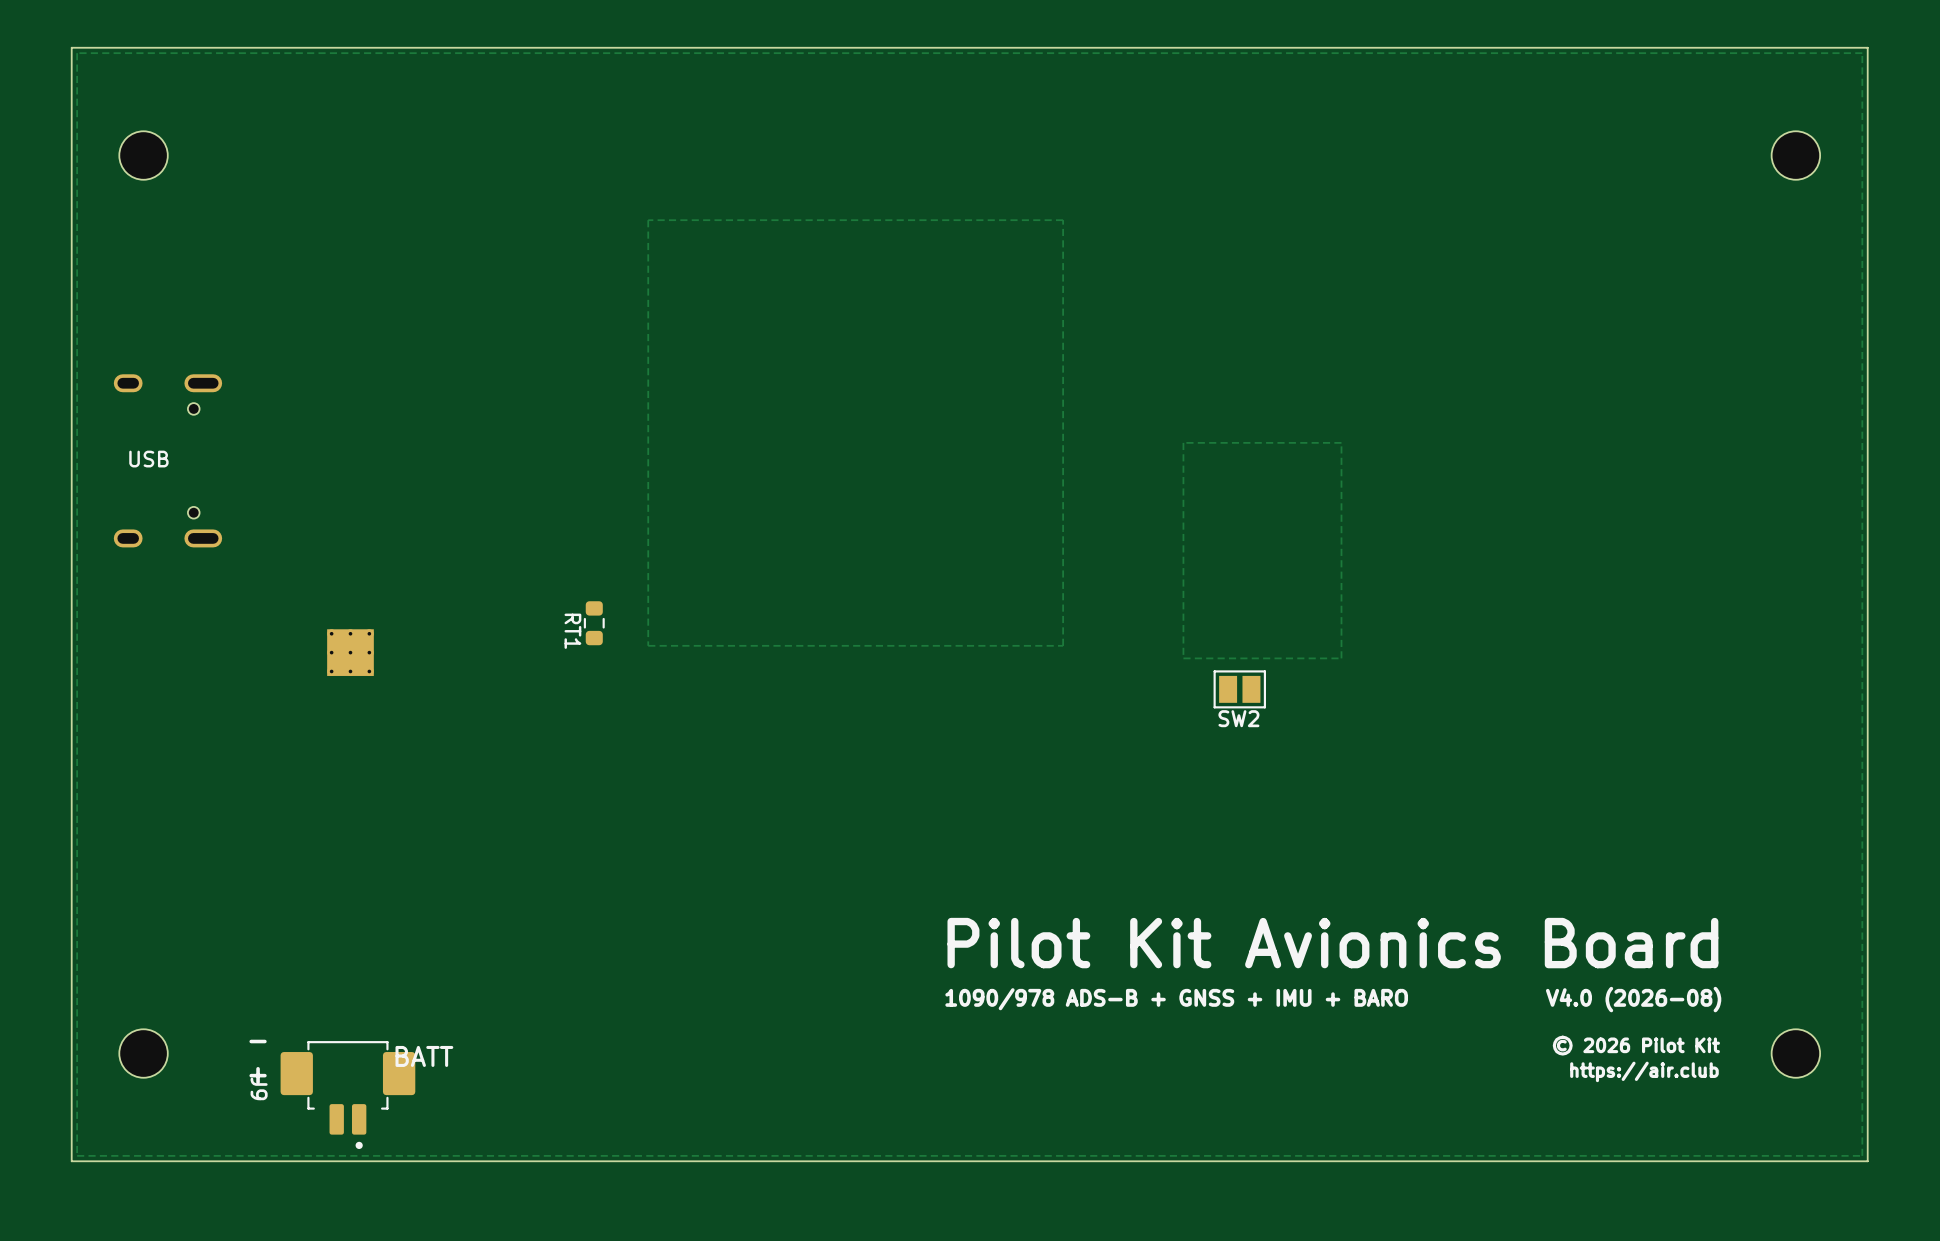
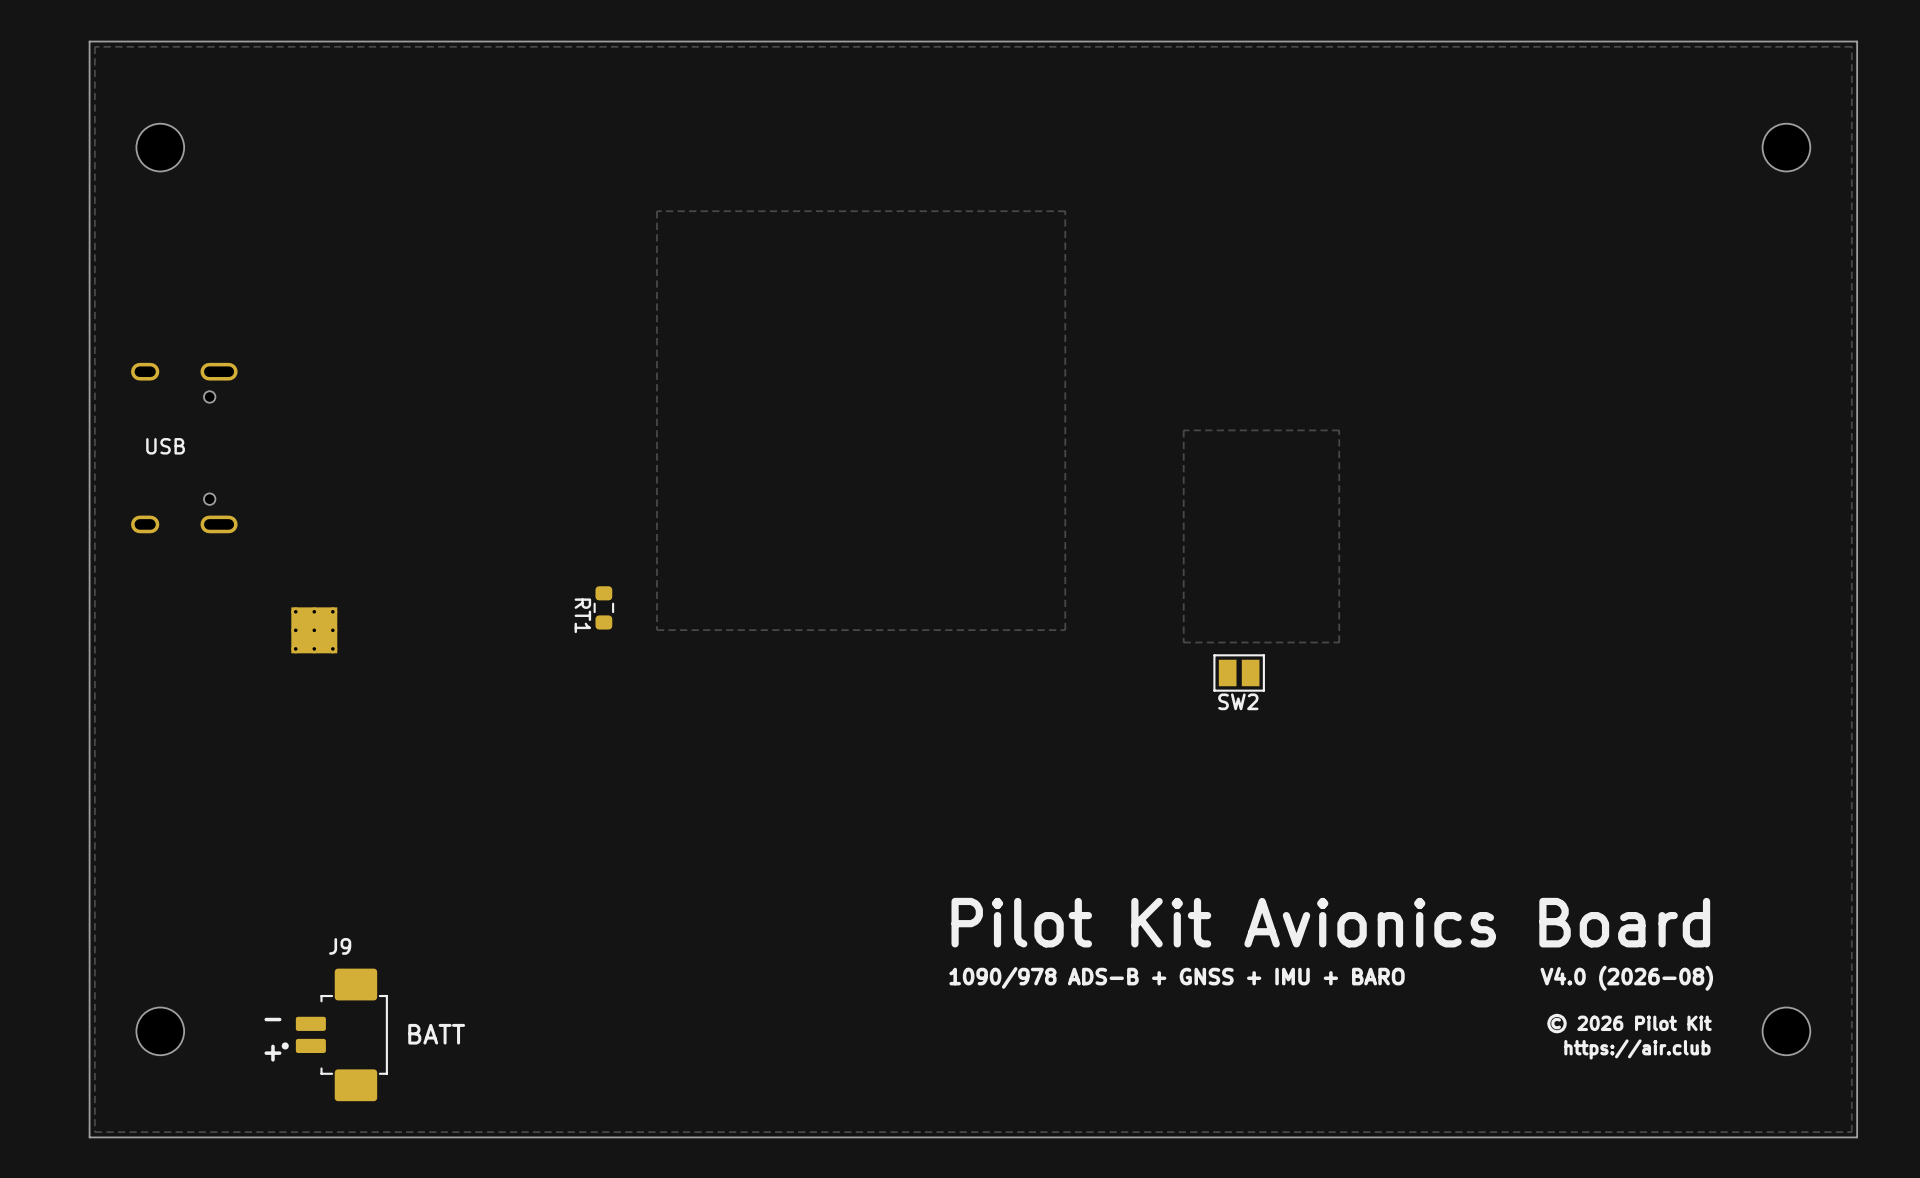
part position: (350, 652) -> (314, 630)
J9 rotation: 0° (347, 1095) -> 90° clockwise (334, 1034)

